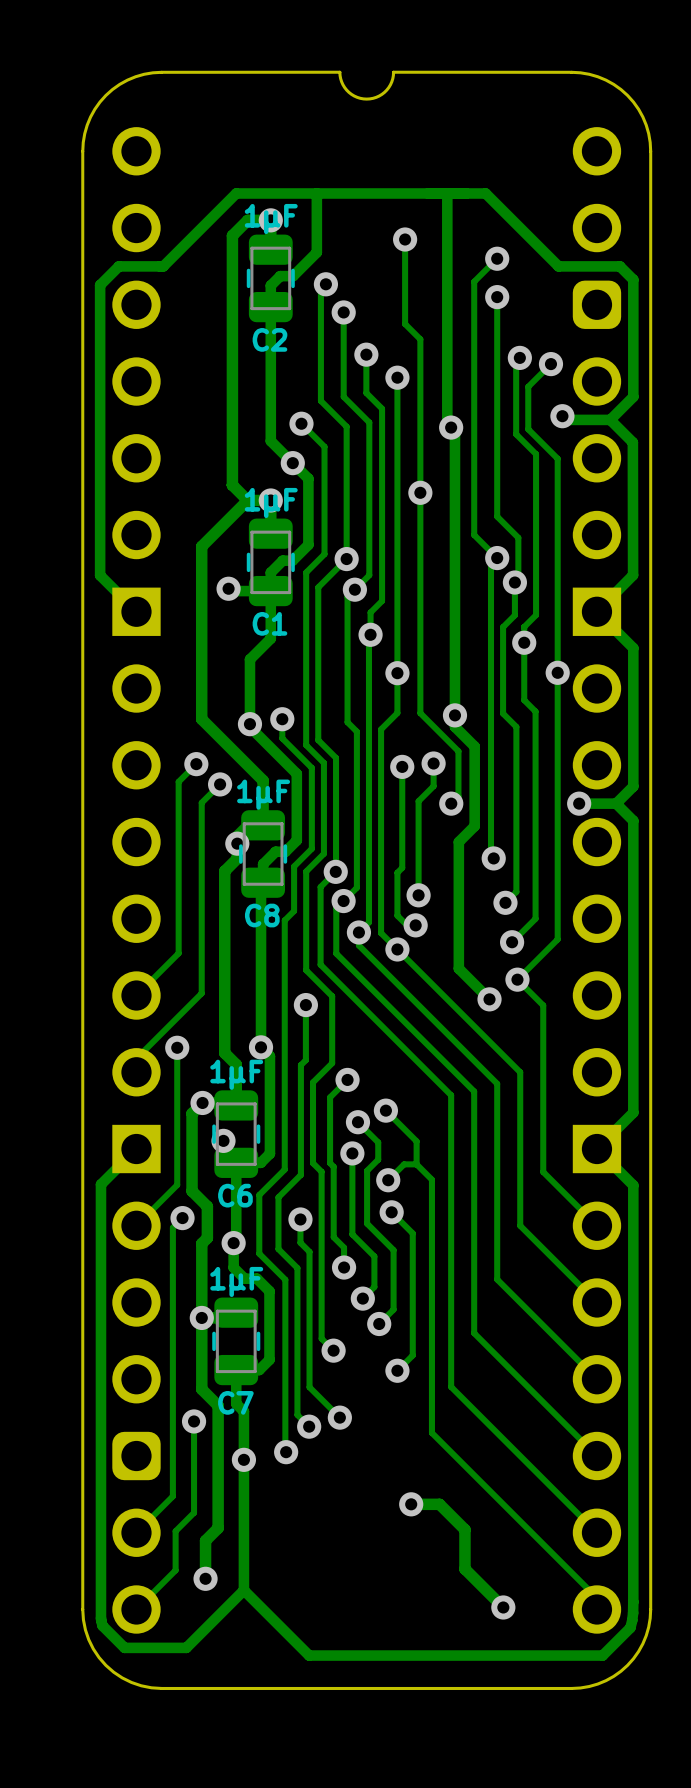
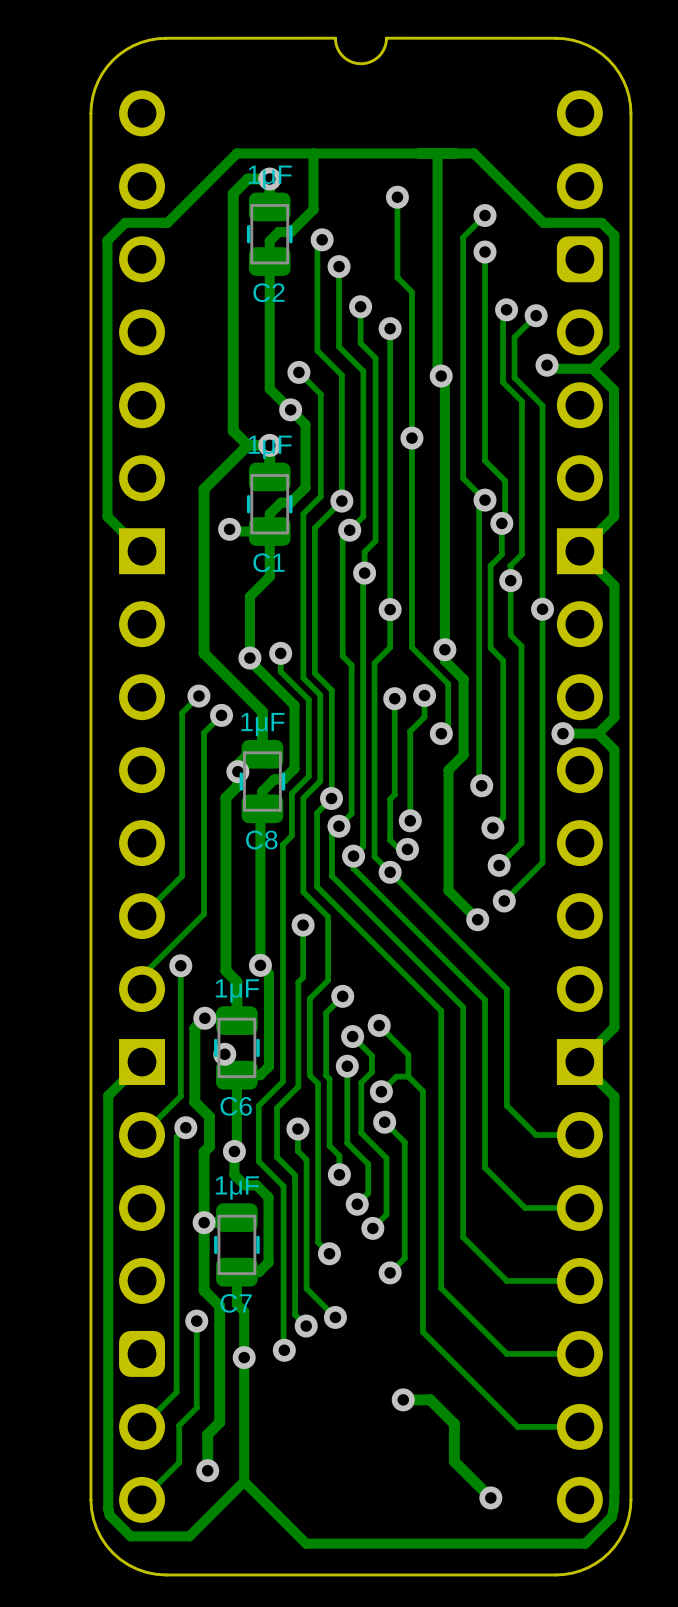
track: (517, 979) (543, 1005) (543, 1172) (596, 1225) -> (506, 1105) (536, 1135) (579, 1135)
track: (520, 1195) (520, 1225) (596, 1302) -> (485, 1167) (525, 1207) (579, 1207)
track: (497, 1260) (497, 1279) (596, 1379) -> none
track: (520, 1379) (596, 1456) -> (506, 1280) (579, 1280)
track: (520, 1456) (596, 1532) -> (506, 1353) (579, 1353)
track: (531, 1532) (596, 1597) -> (517, 1426) (579, 1426)

